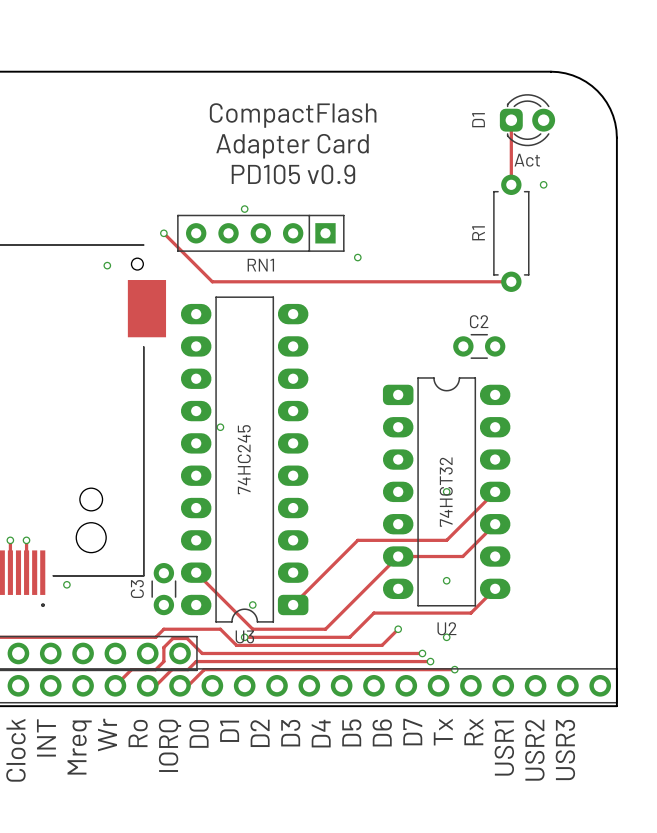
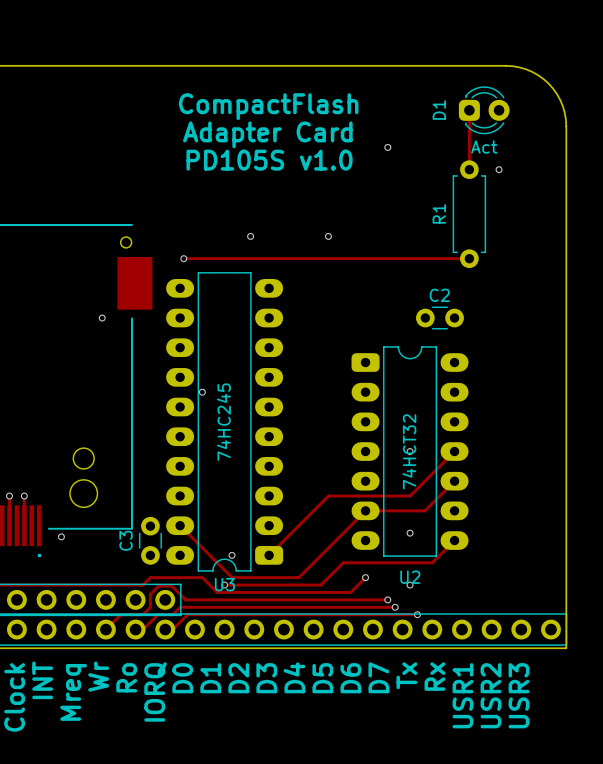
via: none -> (387, 147)
text: PD105 v0.9 (293, 174) -> PD105S v1.0 (269, 160)
via: (244, 209) -> none
track: (163, 233) (212, 281) -> (183, 258) (194, 258)
via: (163, 233) -> none
RN1: (260, 233) -> none
via: none -> (250, 236)
via: (107, 265) -> none
via: none -> (183, 258)
via: none -> (102, 318)

